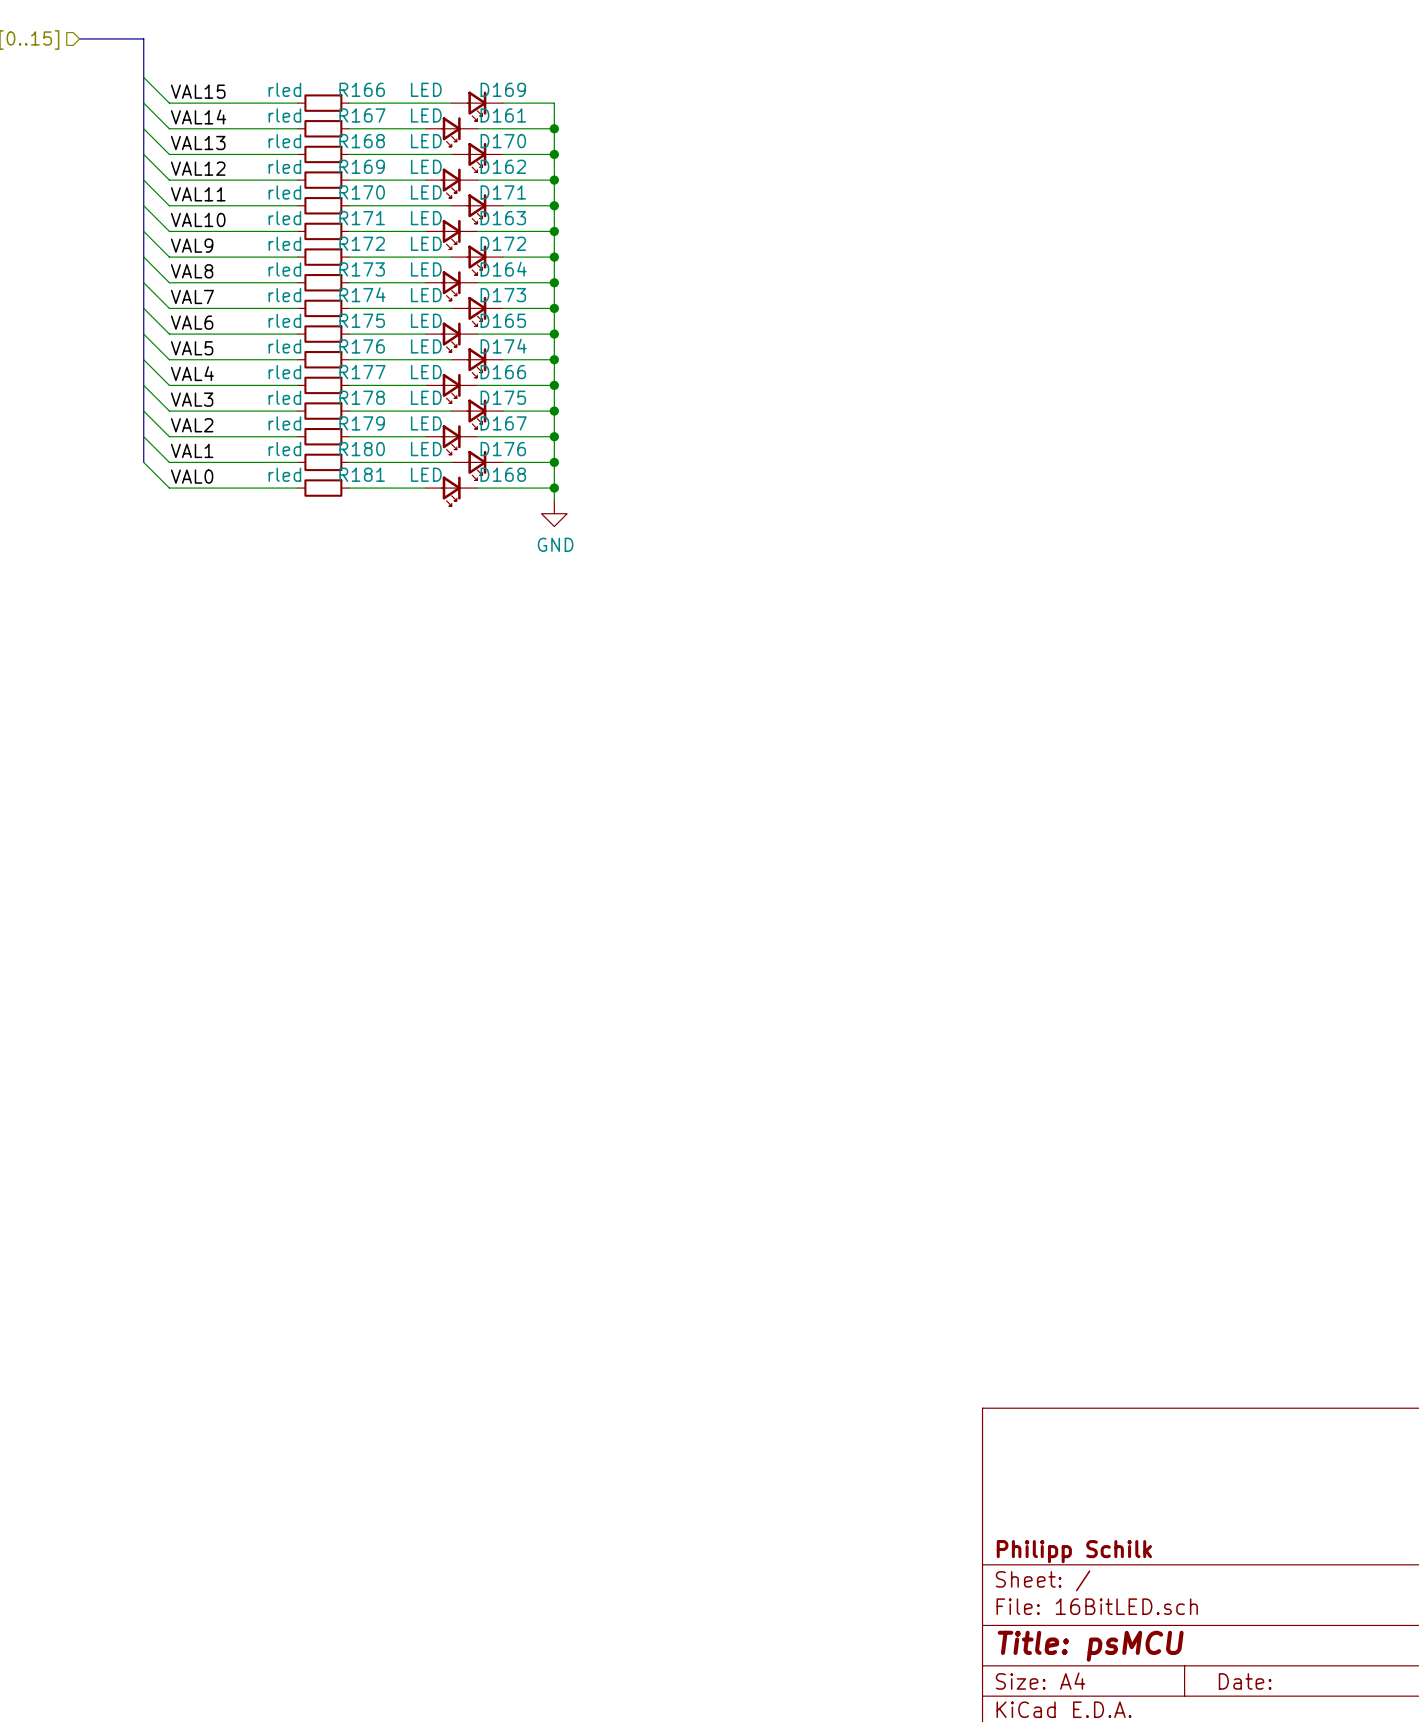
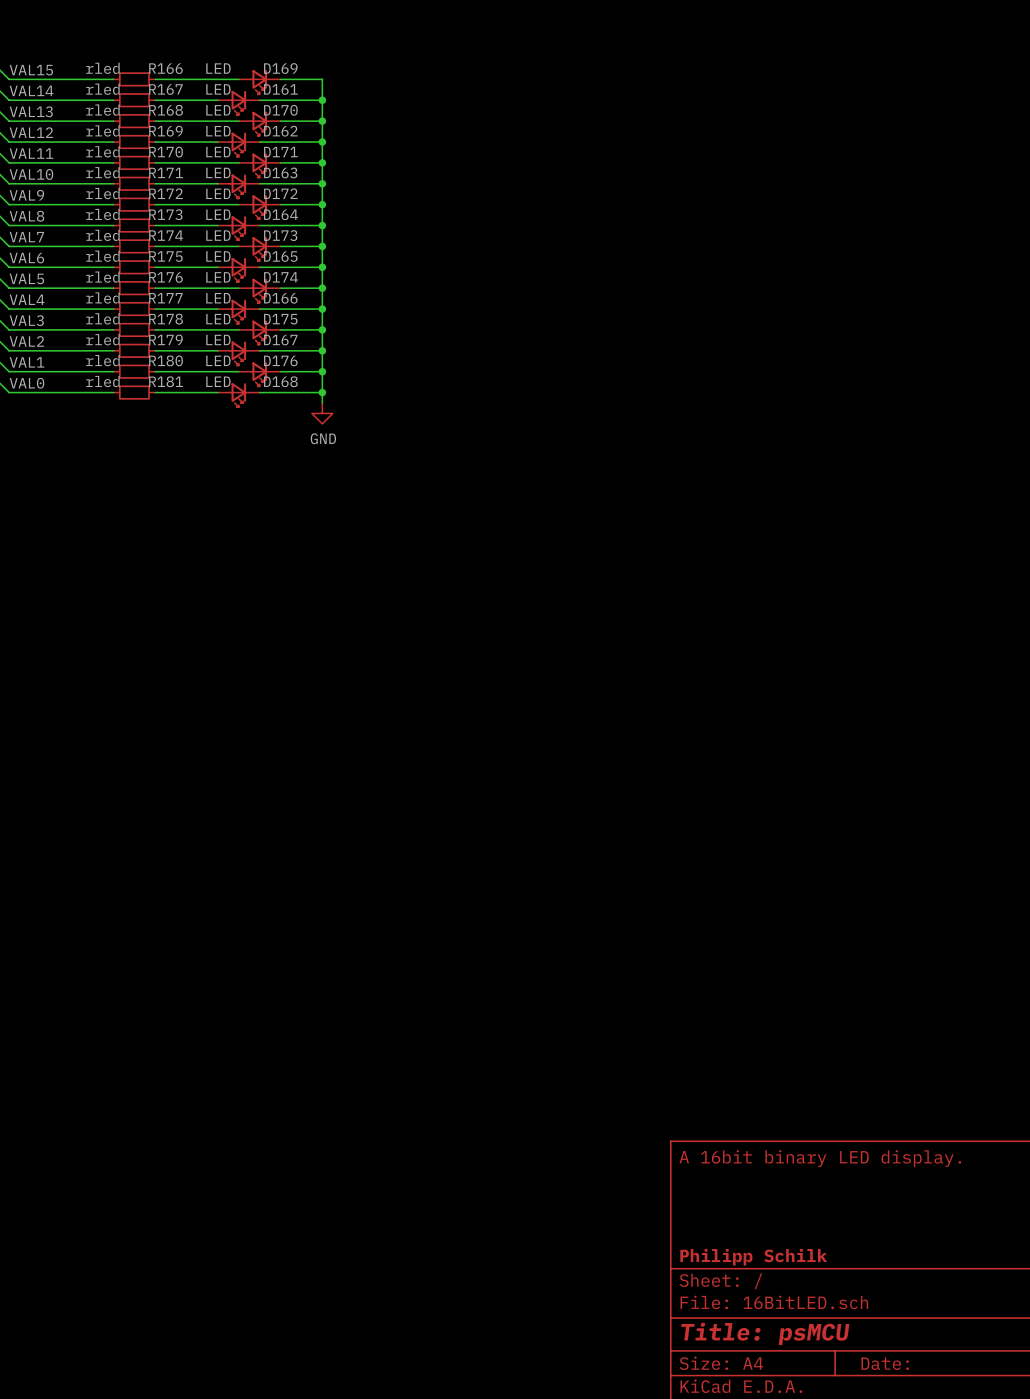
title block: none -> A 16bit binary LED display. (820, 1158)

